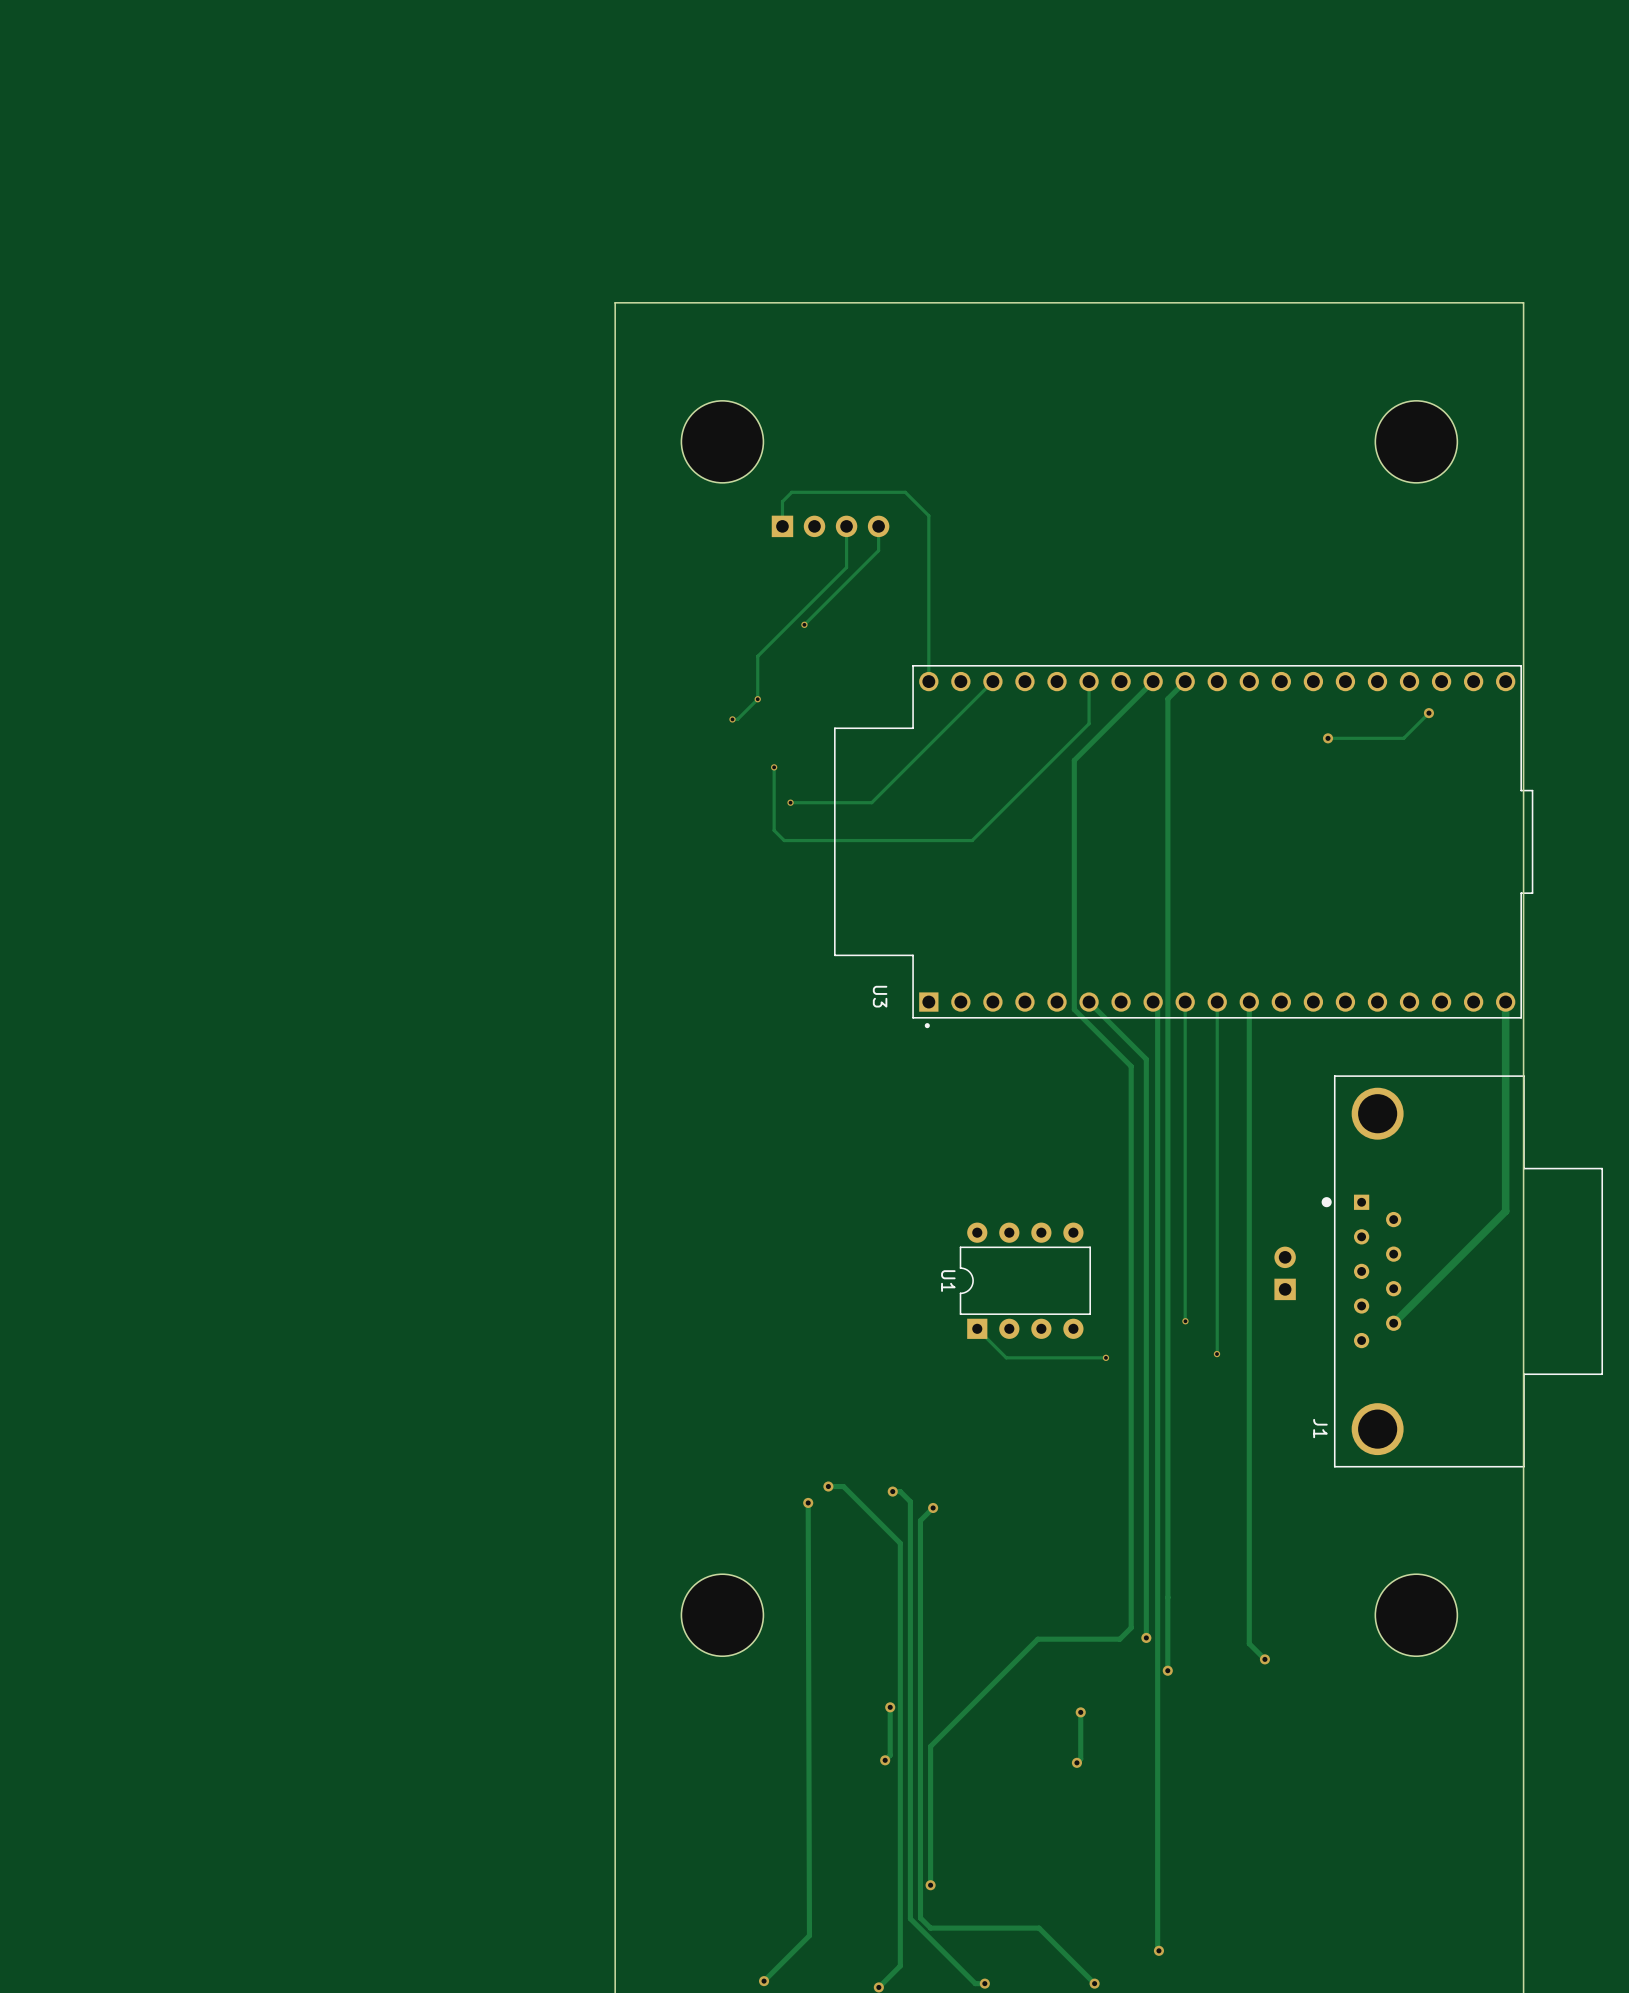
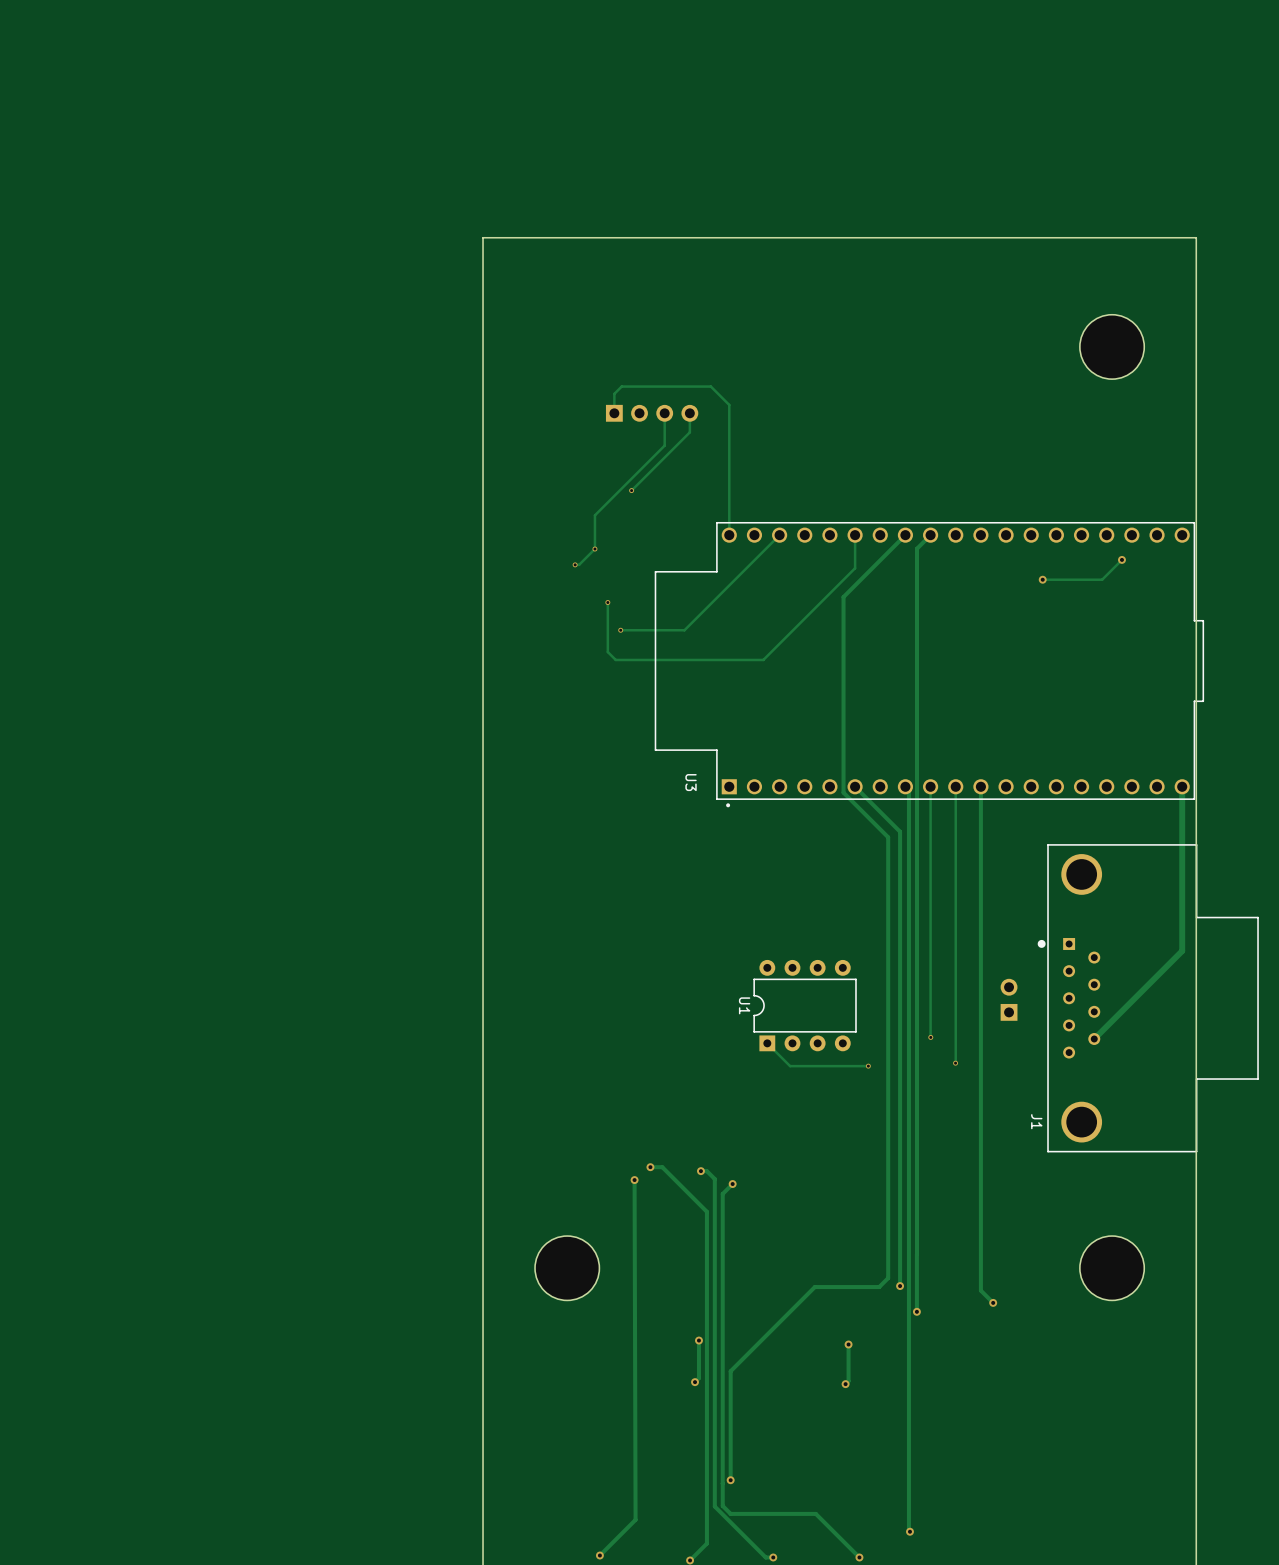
part: (722, 441) -> none

